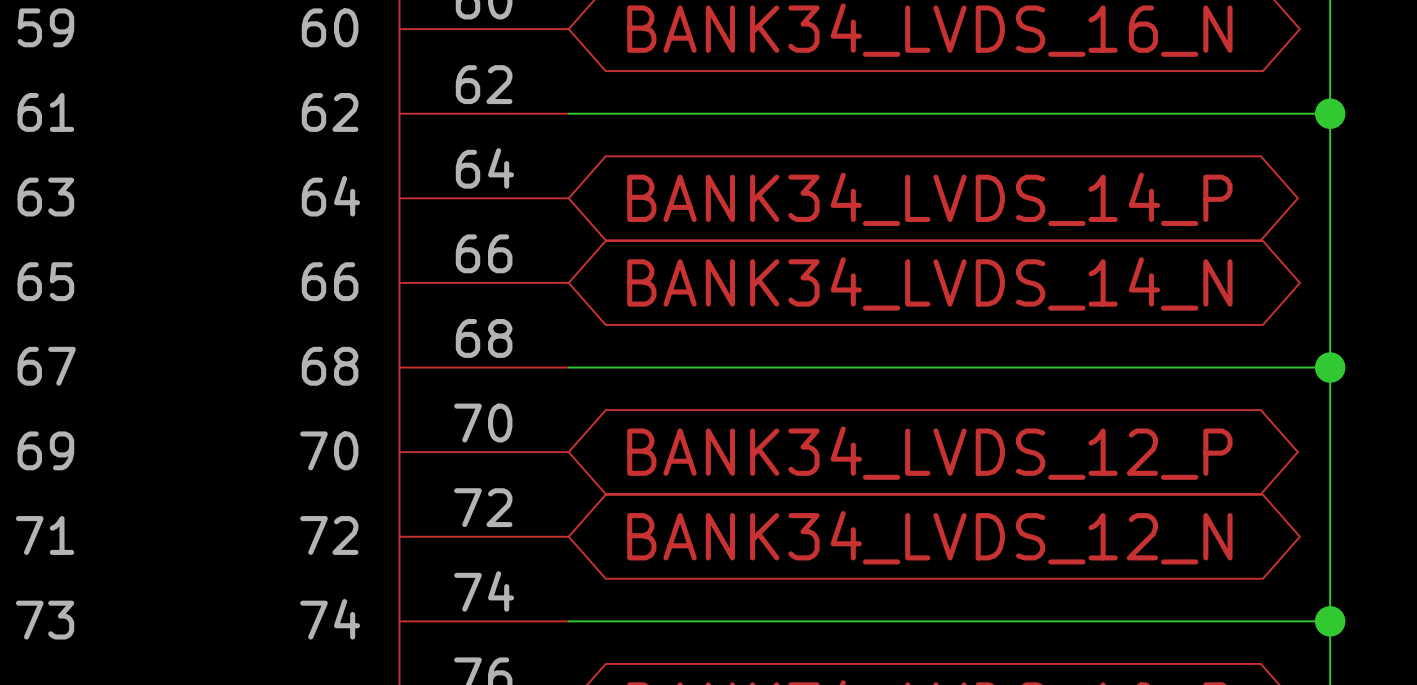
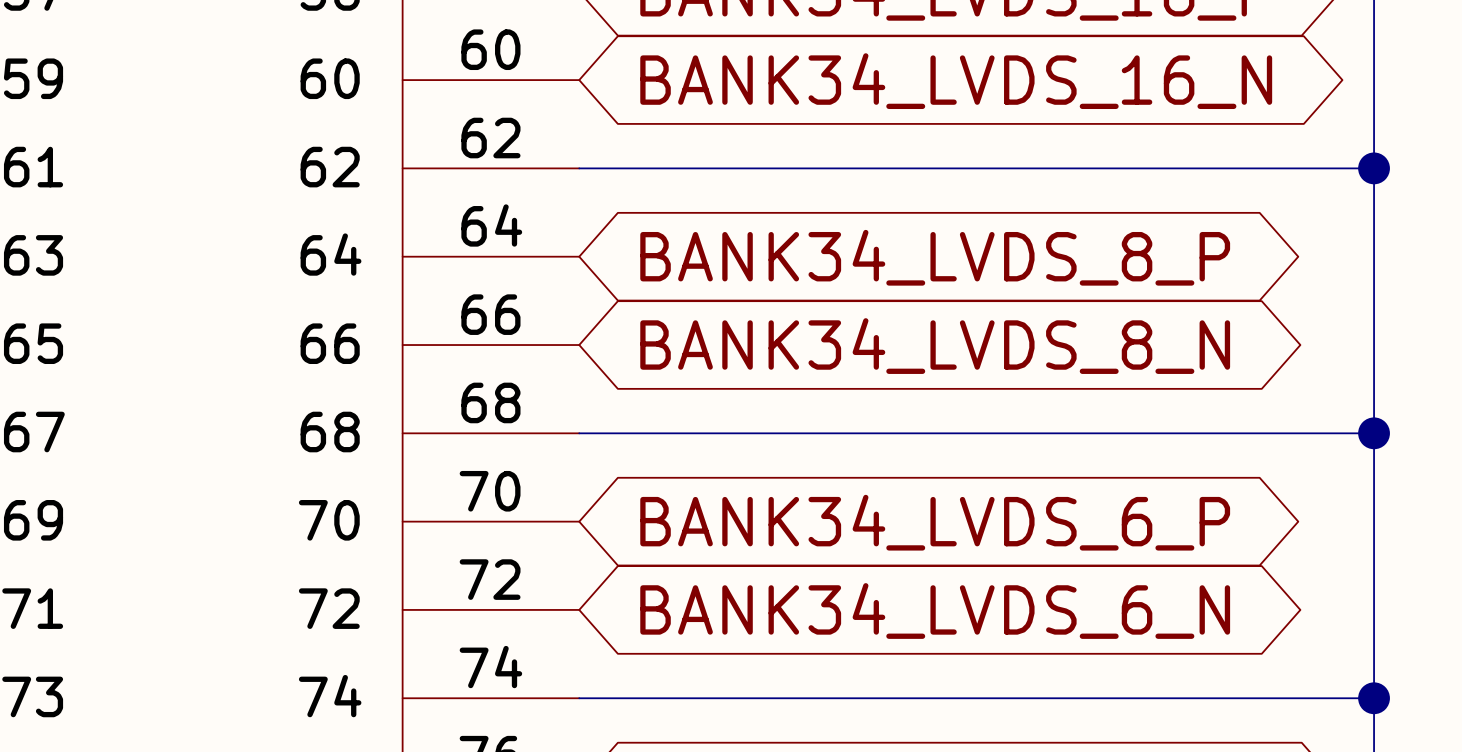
global label: BANK34_LVDS_14_P (929, 199) -> BANK34_LVDS_8_P (935, 257)
global label: BANK34_LVDS_14_N (929, 283) -> BANK34_LVDS_8_N (935, 346)
global label: BANK34_LVDS_12_P (929, 453) -> BANK34_LVDS_6_P (935, 522)
global label: BANK34_LVDS_12_N (929, 537) -> BANK34_LVDS_6_N (935, 611)

